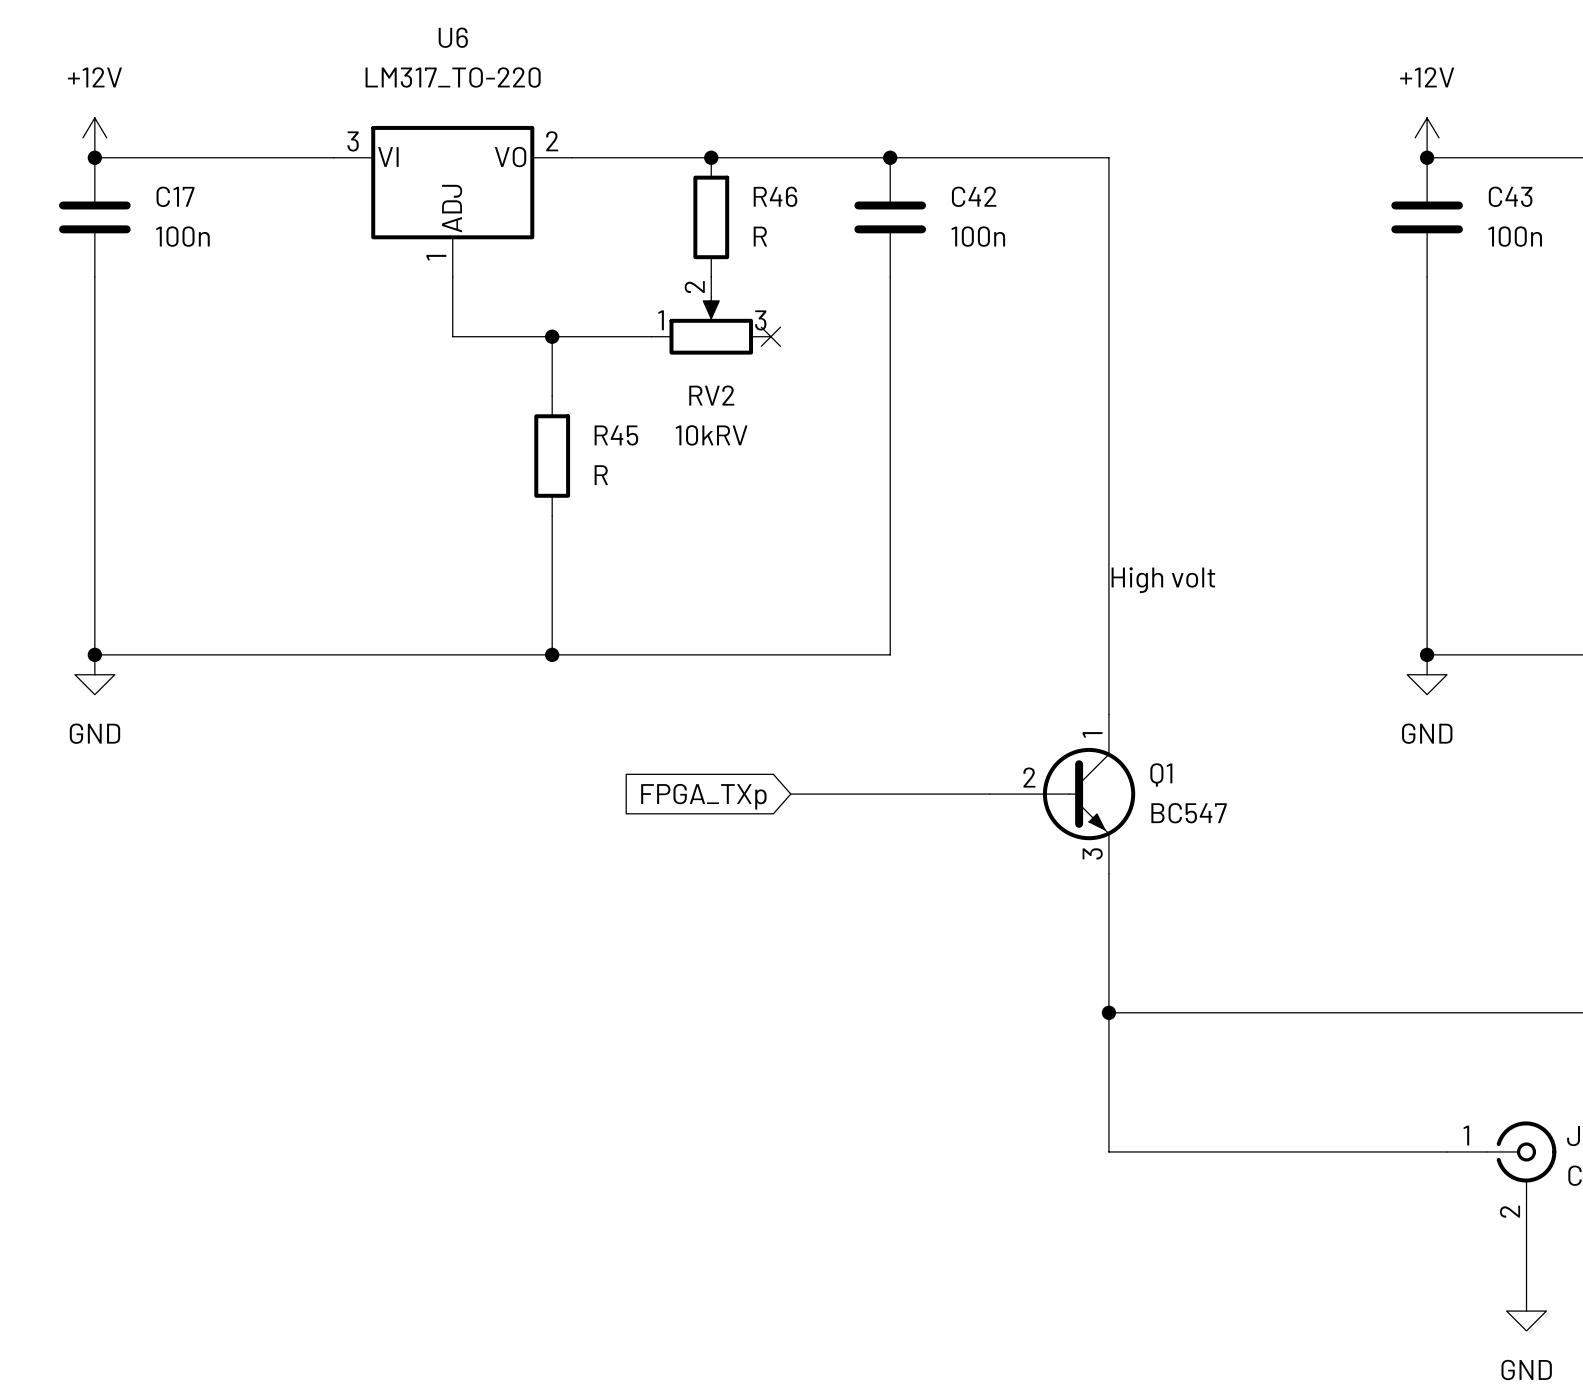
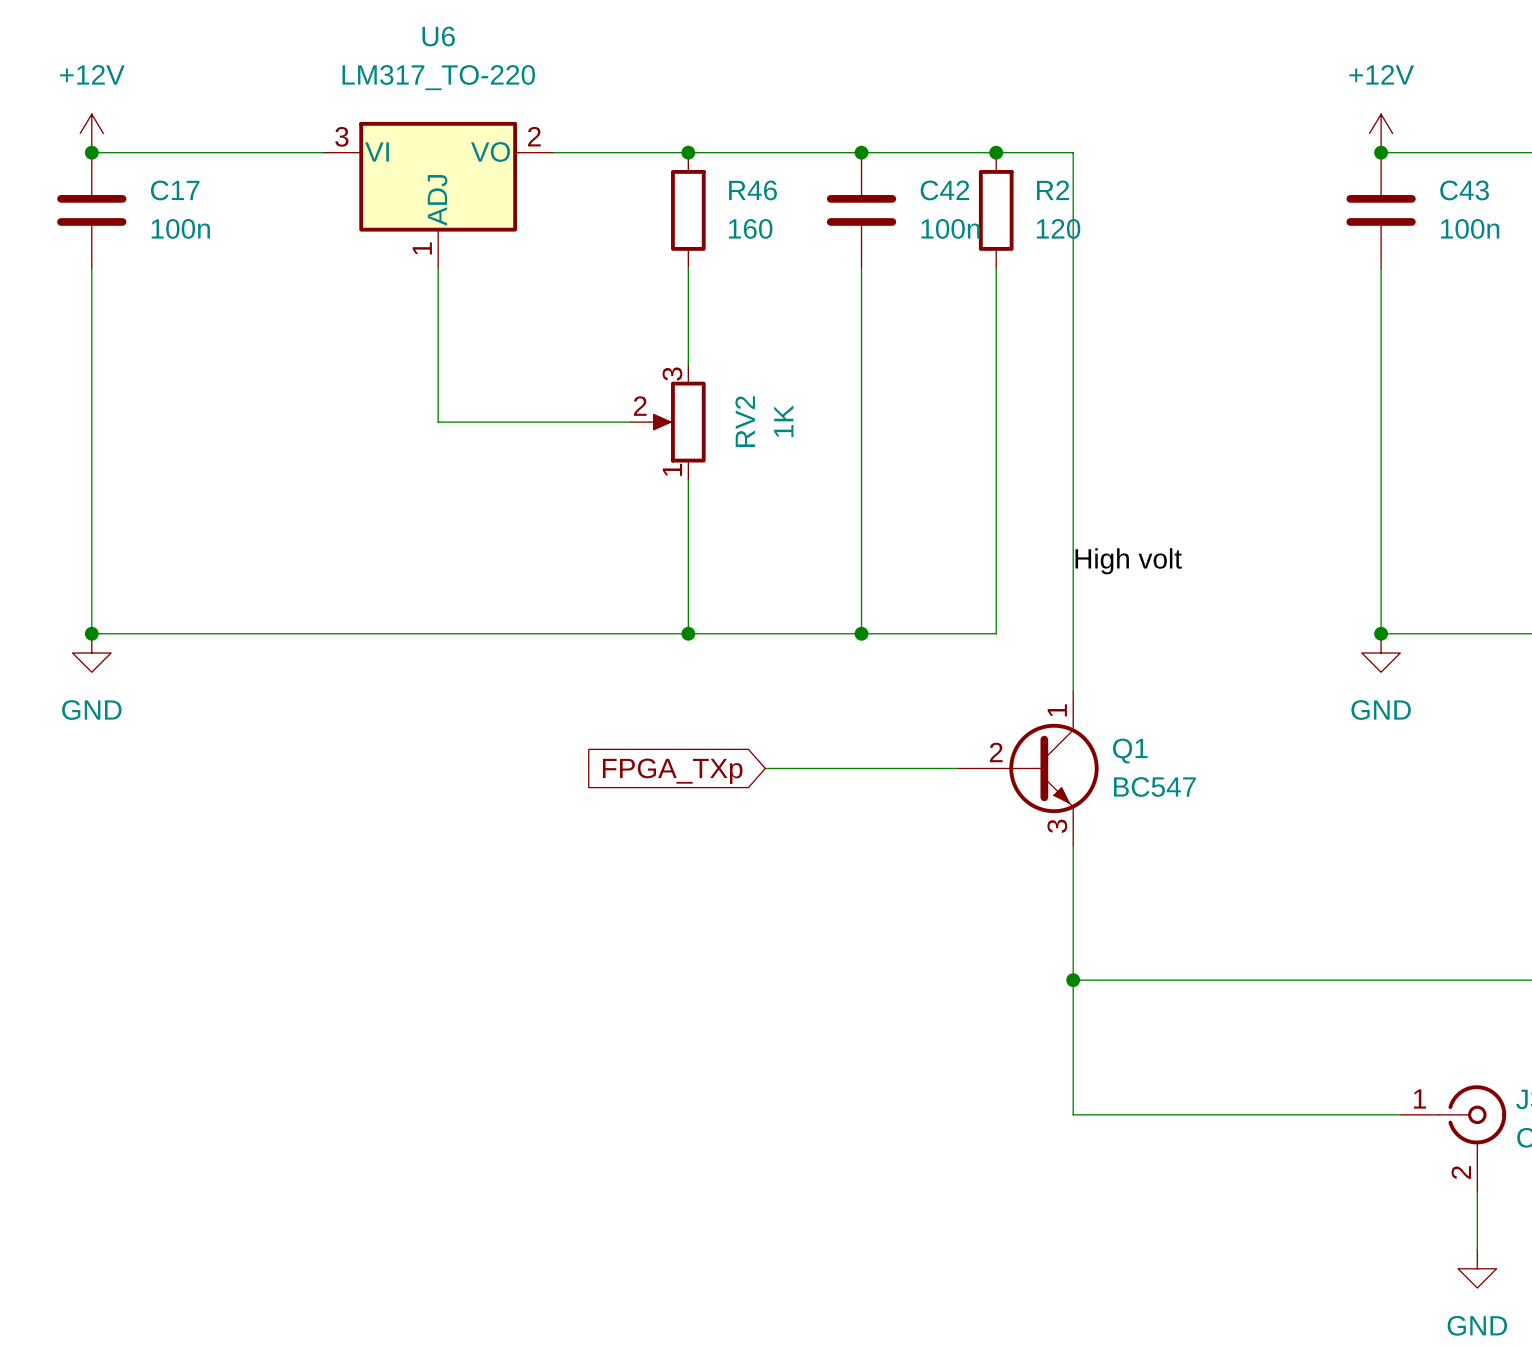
junction: none -> (996, 152)
R2: none -> 120 (996, 210)
R46 value: R (760, 236) -> 160 (750, 228)
wire: none -> (688, 268) (688, 364)
wire: none -> (996, 268) (996, 633) (861, 633)
RV2 position: (711, 315) -> (668, 422)
RV2 rotation: 0° (711, 325) -> 90° counterclockwise (677, 422)
wire: (452, 336) (651, 336) -> (438, 325) (438, 422) (630, 422)
wire: (552, 336) (552, 396) -> none
junction: (552, 336) -> none
no-connect mark: (770, 336) -> none
RV2 value: 10kRV (711, 435) -> 1K (783, 421)
R45: R (552, 456) -> none
wire: none -> (688, 479) (688, 633)
wire: (552, 515) (552, 654) -> none
junction: (552, 654) -> none
junction: none -> (688, 633)
junction: none -> (861, 633)

